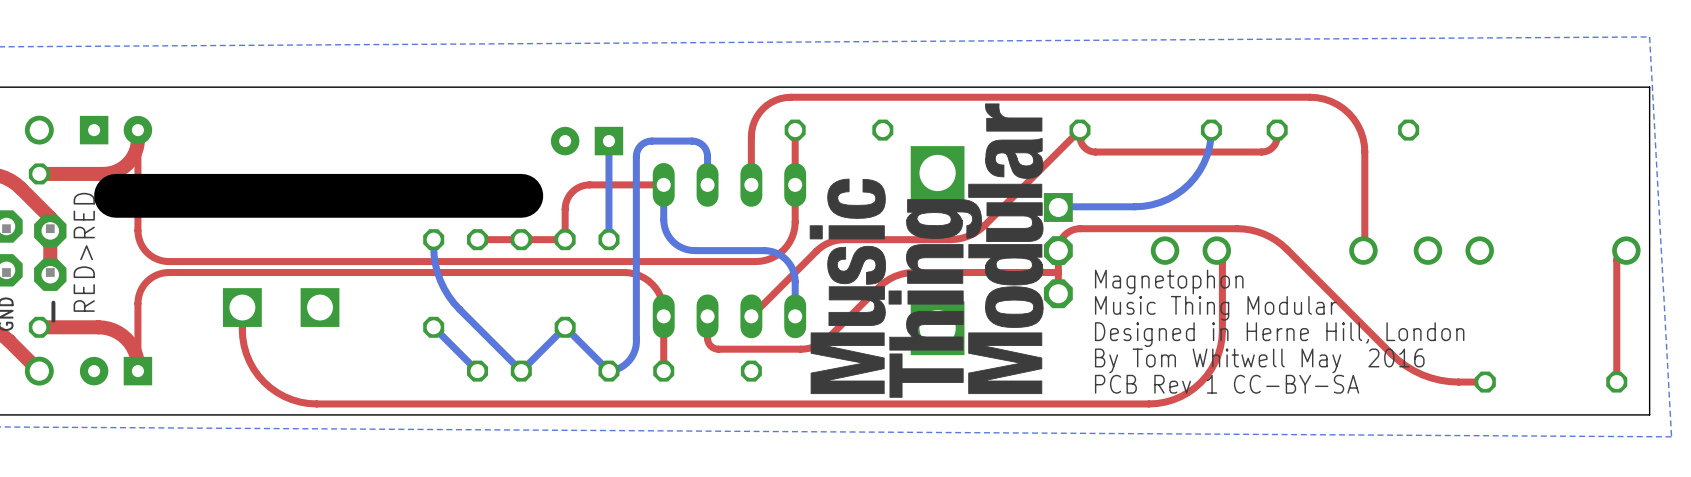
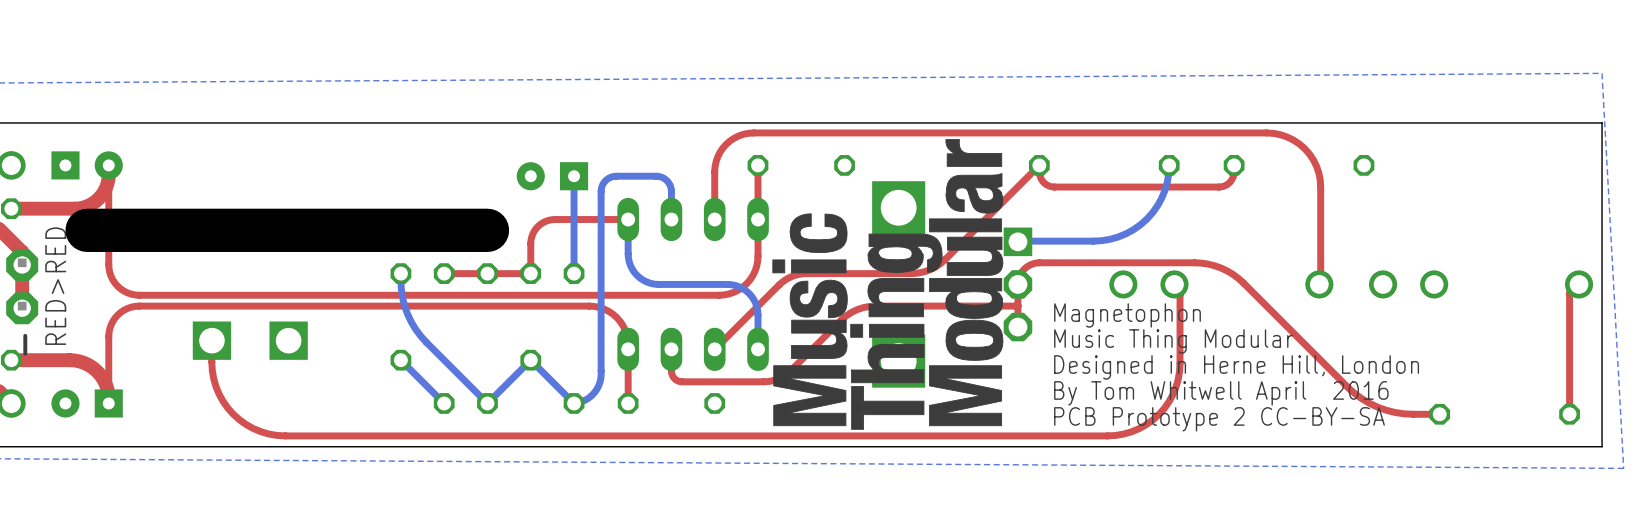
text: By Tom Whitwell May 2016 (1259, 360) -> By Tom Whitwell April 2016 (1221, 393)
text: PCB Rev 1 CC-BY-SA (1227, 384) -> PCB Prototype 2 CC-BY-SA (1219, 419)

